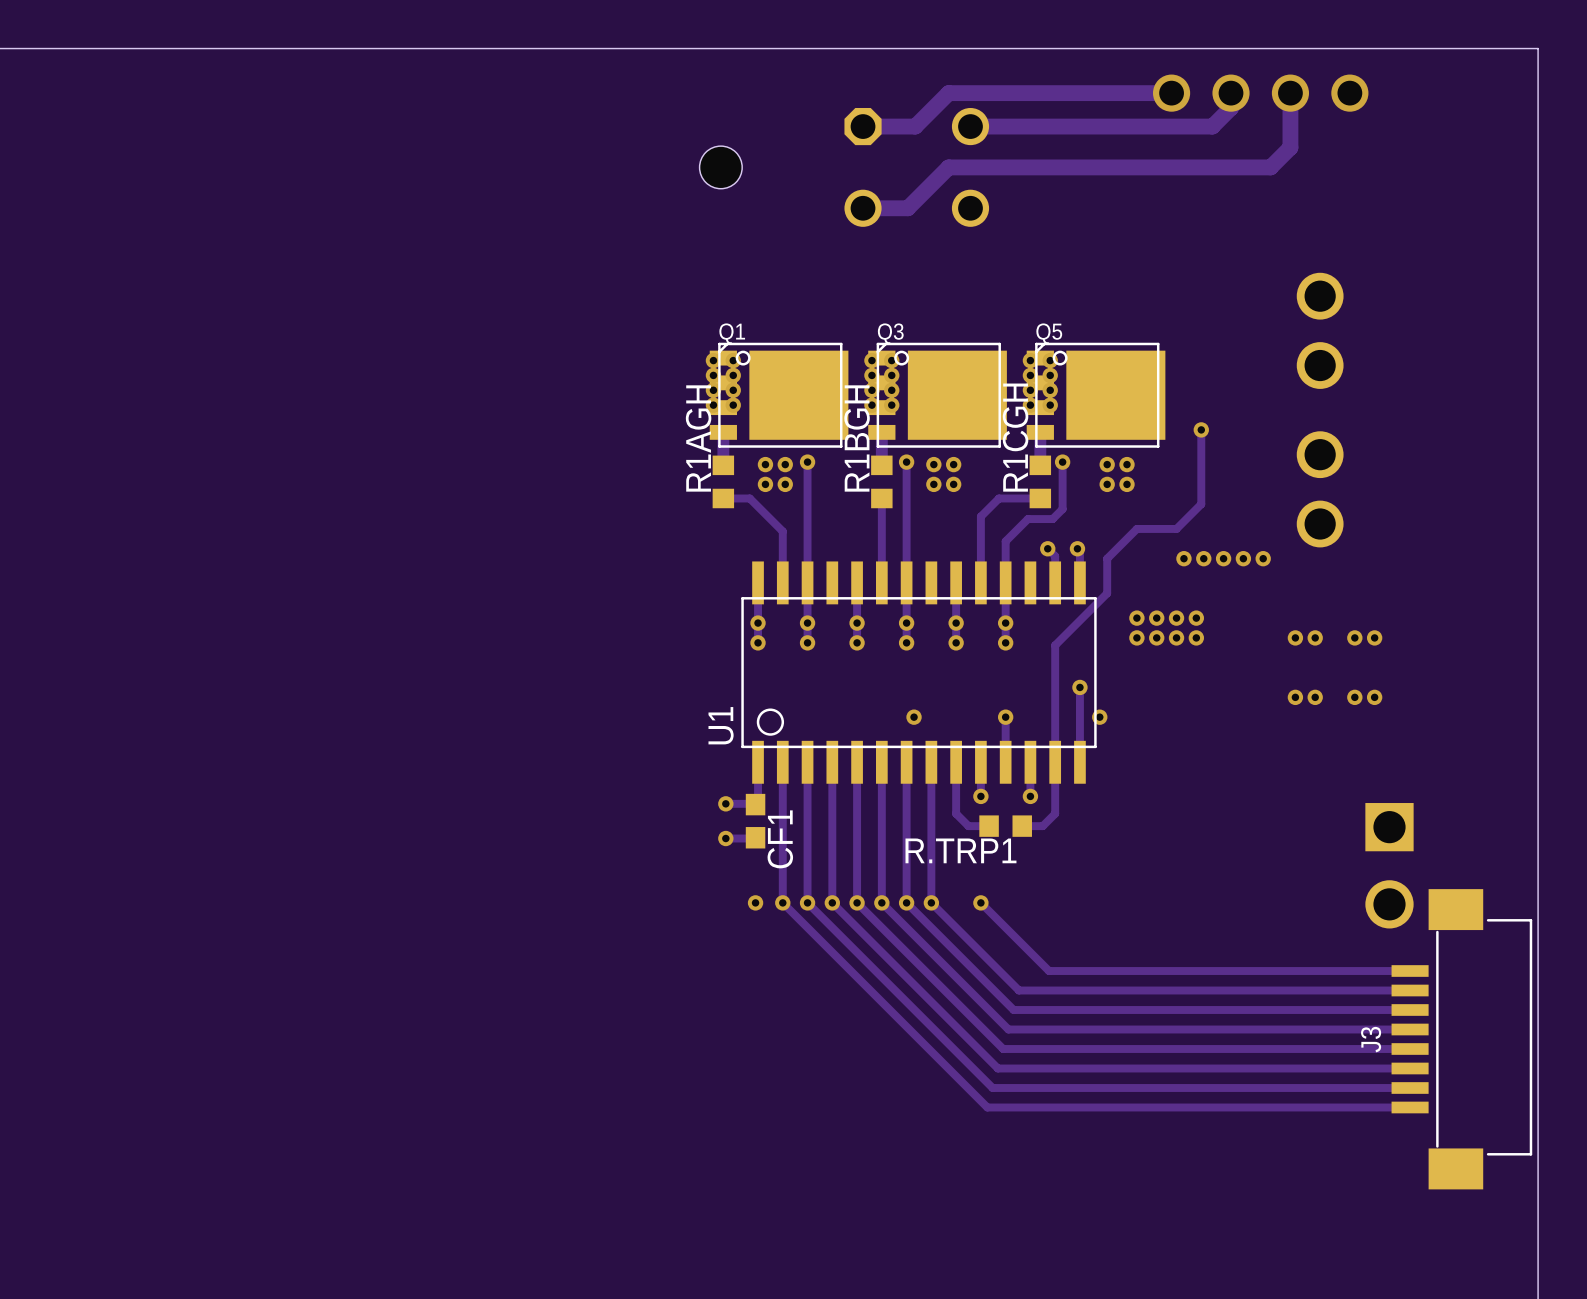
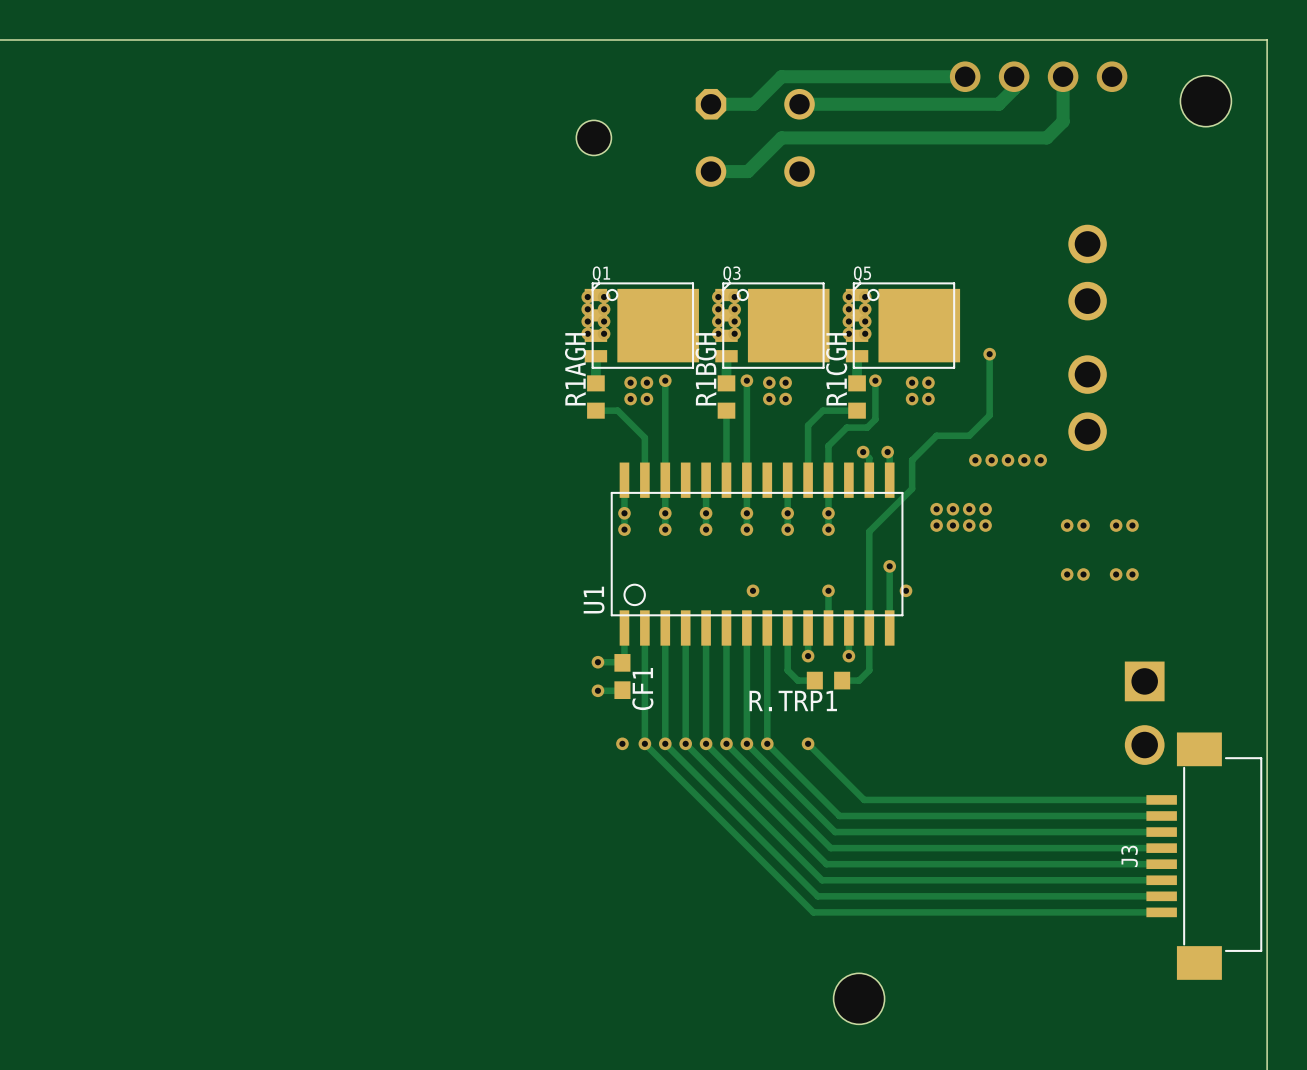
hole: none -> (1205, 101)
hole: none -> (859, 998)

